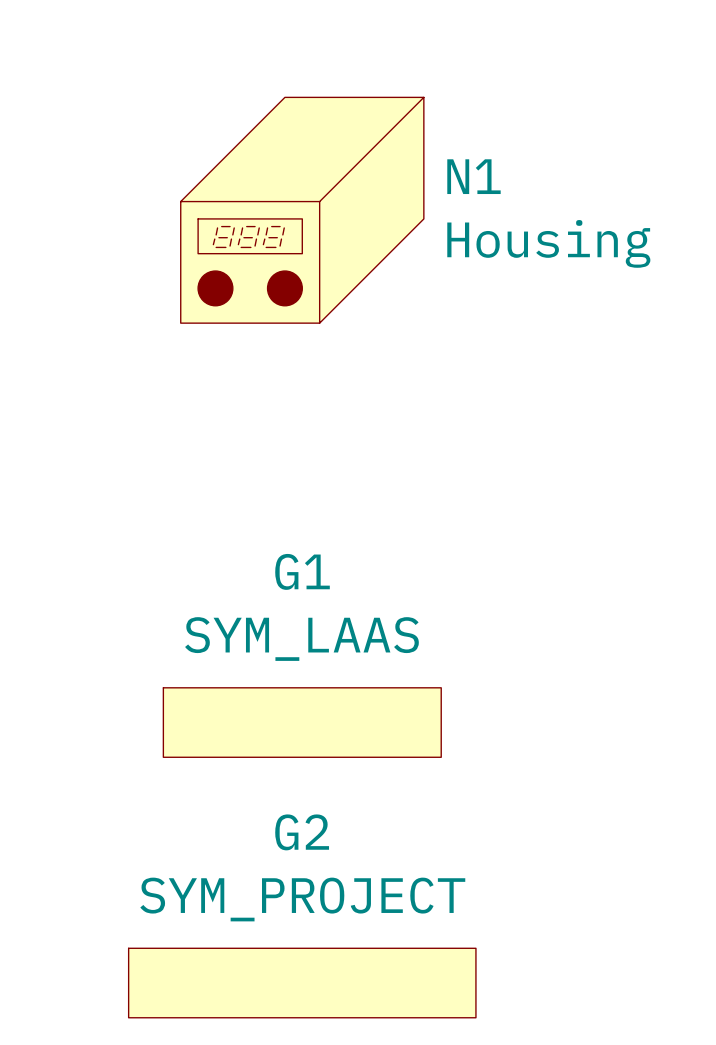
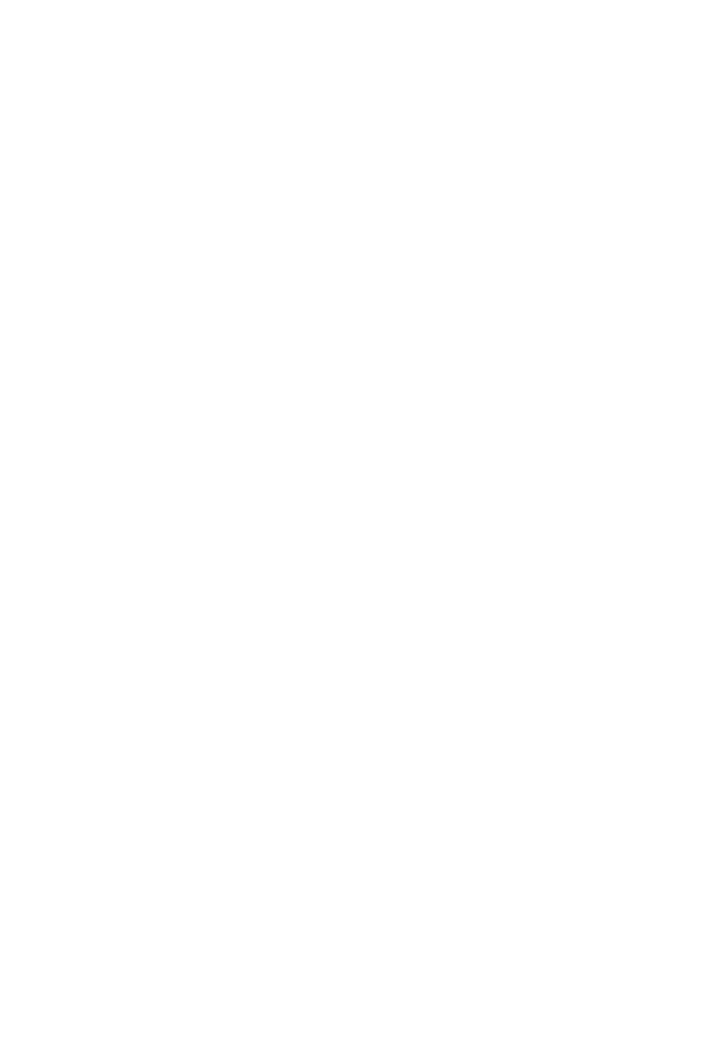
N1: Housing (302, 210) -> none
G1: SYM_LAAS (302, 722) -> none
G2: SYM_PROJECT (302, 983) -> none

